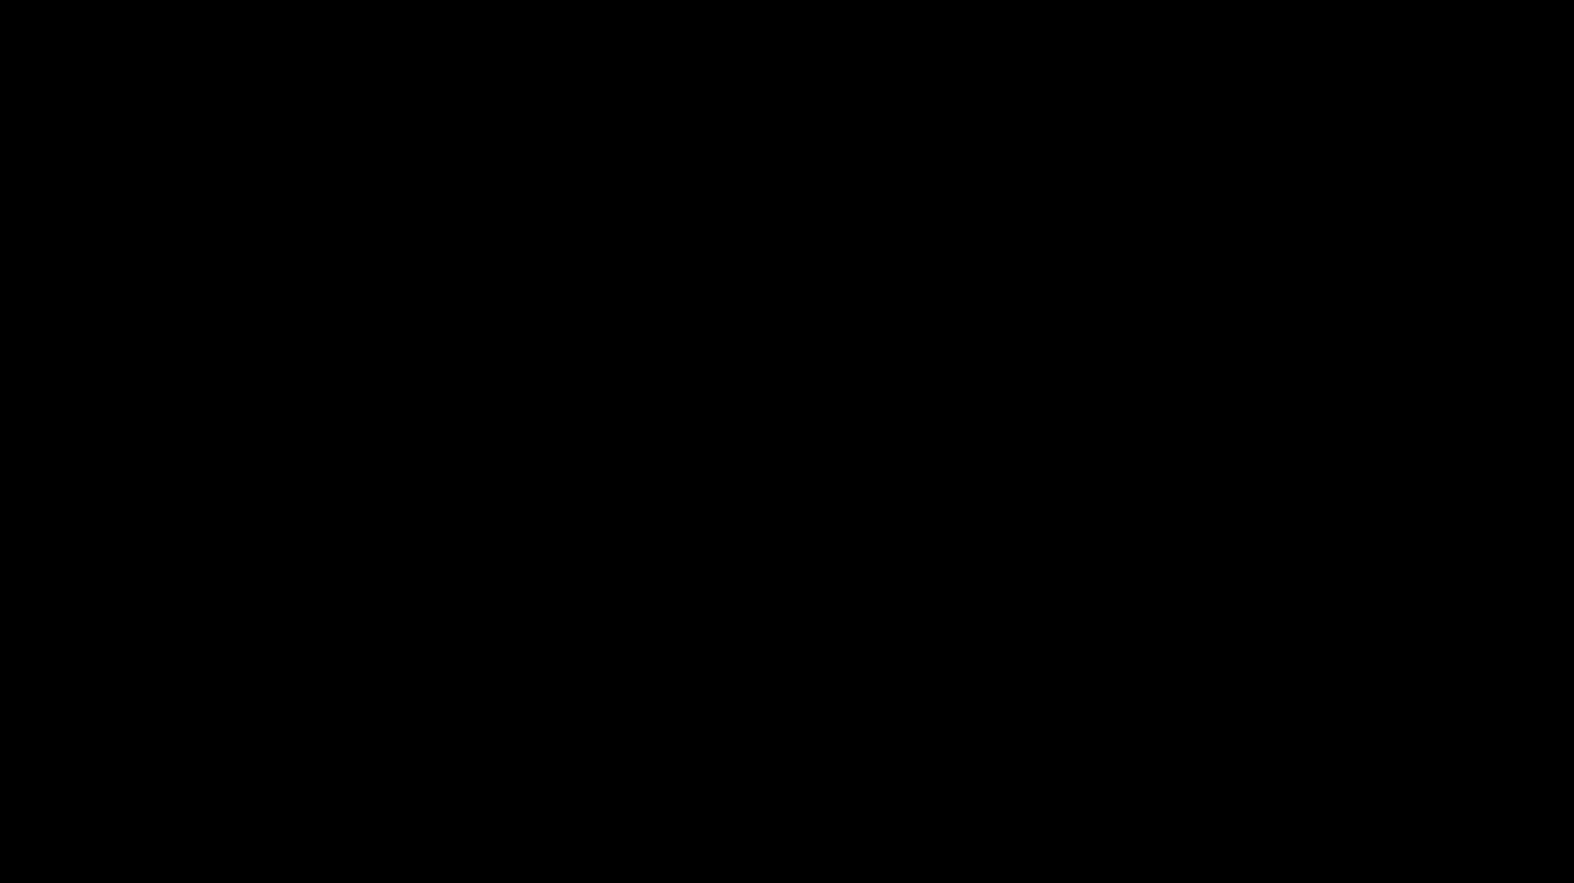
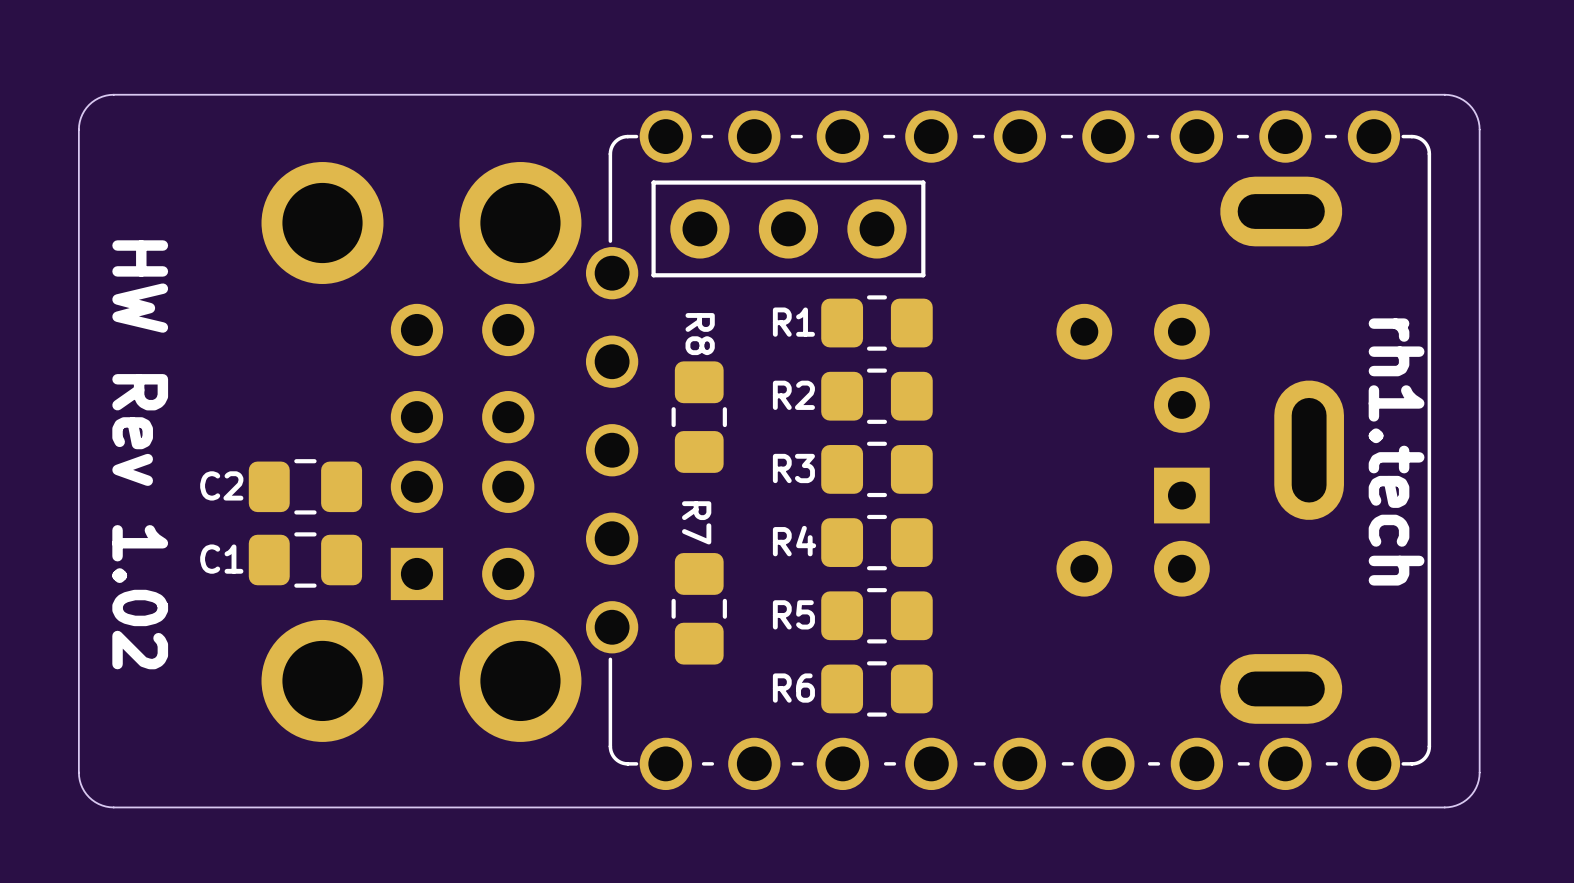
board edge: none -> (1444, 94) (113, 94) (98, 98) (84, 111) (78, 129) (78, 772) (82, 787) (95, 802) (113, 807) (1444, 807) (1459, 804) (1474, 791) (1479, 772) (1479, 129) (1477, 118) (1469, 104) (1456, 96) (1444, 94)
part: none -> (788, 228)
R1: none -> (876, 323)
R2: none -> (876, 396)
R8: none -> (699, 417)
part: none -> (1008, 450)
part: none -> (1200, 450)
part: none -> (421, 451)
text: none -> rh1.tech (1396, 451)
text: none -> HW Rev 1.02 (140, 454)
R3: none -> (876, 469)
C2: none -> (305, 486)
R4: none -> (876, 542)
C1: none -> (305, 560)
R7: none -> (699, 608)
R5: none -> (876, 615)
R6: none -> (876, 688)

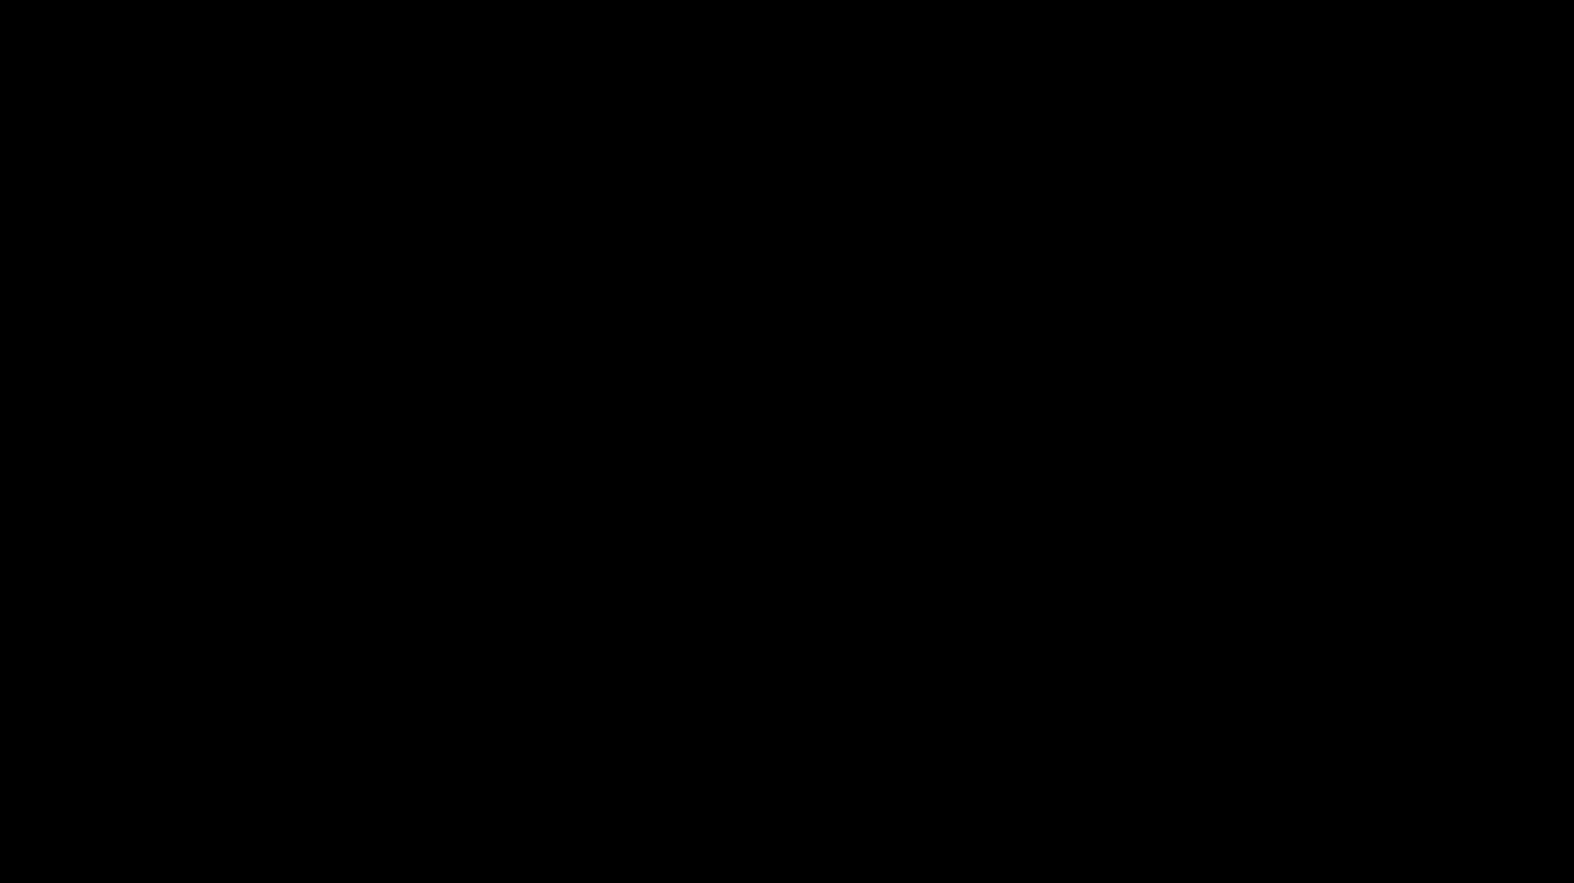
board edge: (1444, 94) (113, 94) (98, 98) (84, 111) (78, 129) (78, 772) (82, 787) (95, 802) (113, 807) (1444, 807) (1459, 804) (1474, 791) (1479, 772) (1479, 129) (1477, 118) (1469, 104) (1456, 96) (1444, 94) -> none
part: (788, 228) -> none
R1: (876, 323) -> none
R2: (876, 396) -> none
R8: (699, 417) -> none
part: (1008, 450) -> none
part: (1200, 450) -> none
part: (421, 451) -> none
text: rh1.tech (1396, 451) -> none
text: HW Rev 1.02 (140, 454) -> none
R3: (876, 469) -> none
C2: (305, 486) -> none
R4: (876, 542) -> none
C1: (305, 560) -> none
R7: (699, 608) -> none
R5: (876, 615) -> none
R6: (876, 688) -> none

